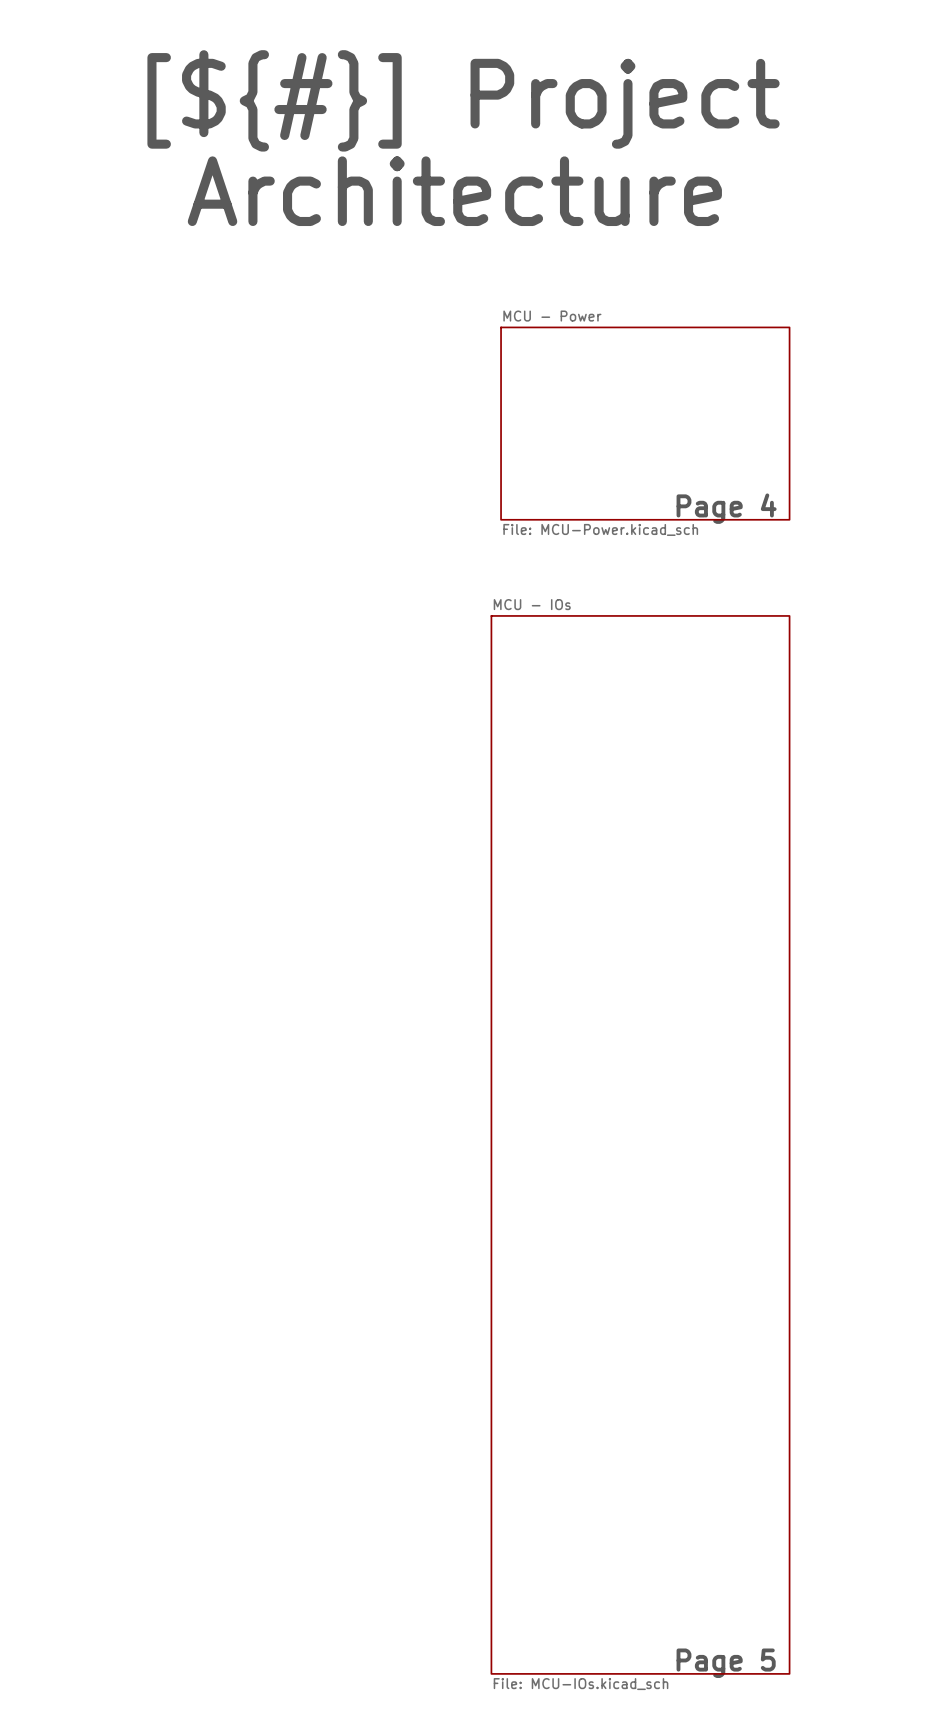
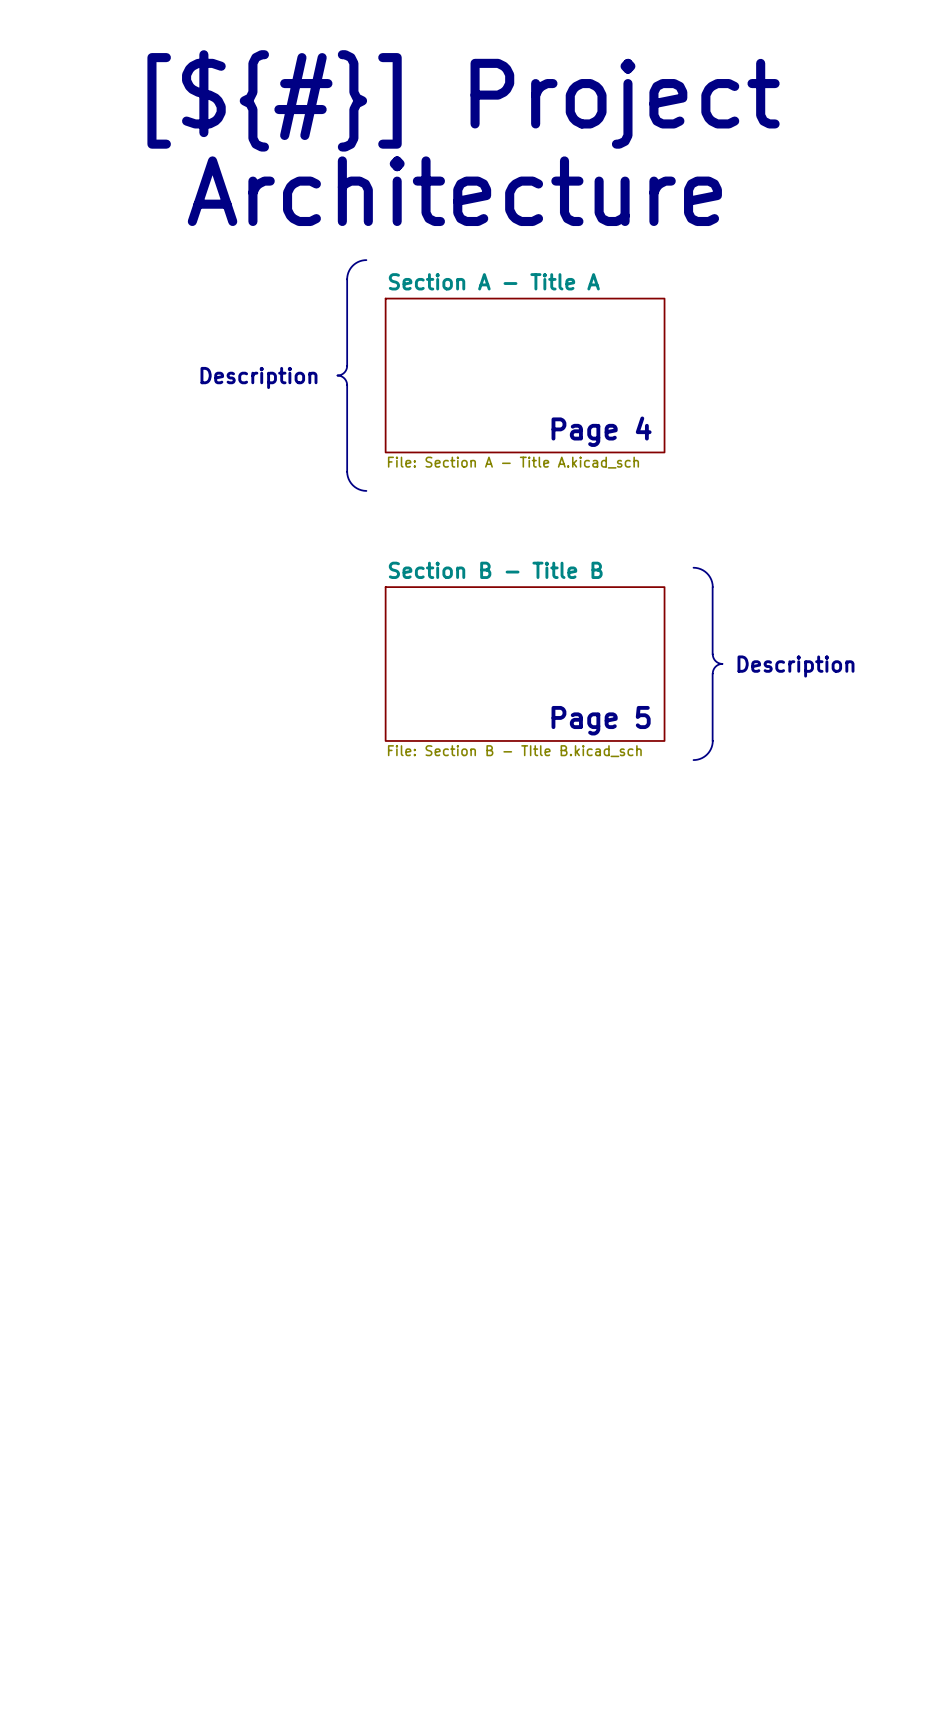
line: none -> (366, 260) (354, 264) (347, 275) (347, 367) (343, 373) (337, 375) (343, 377) (347, 383) (347, 476) (354, 486) (366, 490)
sheet Section A - Title A: none -> File: Section A - Title A.kicad_sch (525, 375)
text: none -> Description (258, 377)
sheet MCU - Power: File: MCU-Power.kicad_sch (645, 423) -> none
text position: Page 4 (726, 508) -> Page 4 (601, 431)
line: none -> (693, 567) (707, 573) (712, 586)
line: none -> (712, 587) (712, 654)
line: none -> (712, 654) (715, 661) (722, 663) (715, 666) (712, 673)
sheet Section B - Title B: none -> File: Section B - TItle B.kicad_sch (525, 664)
text: none -> Description (795, 666)
line: none -> (712, 673) (712, 740)
text: none -> Page 5 (601, 720)
line: none -> (712, 740) (707, 754) (693, 760)
sheet MCU - IOs: File: MCU-IOs.kicad_sch (640, 1144) -> none
text: Page 5 (726, 1663) -> none

